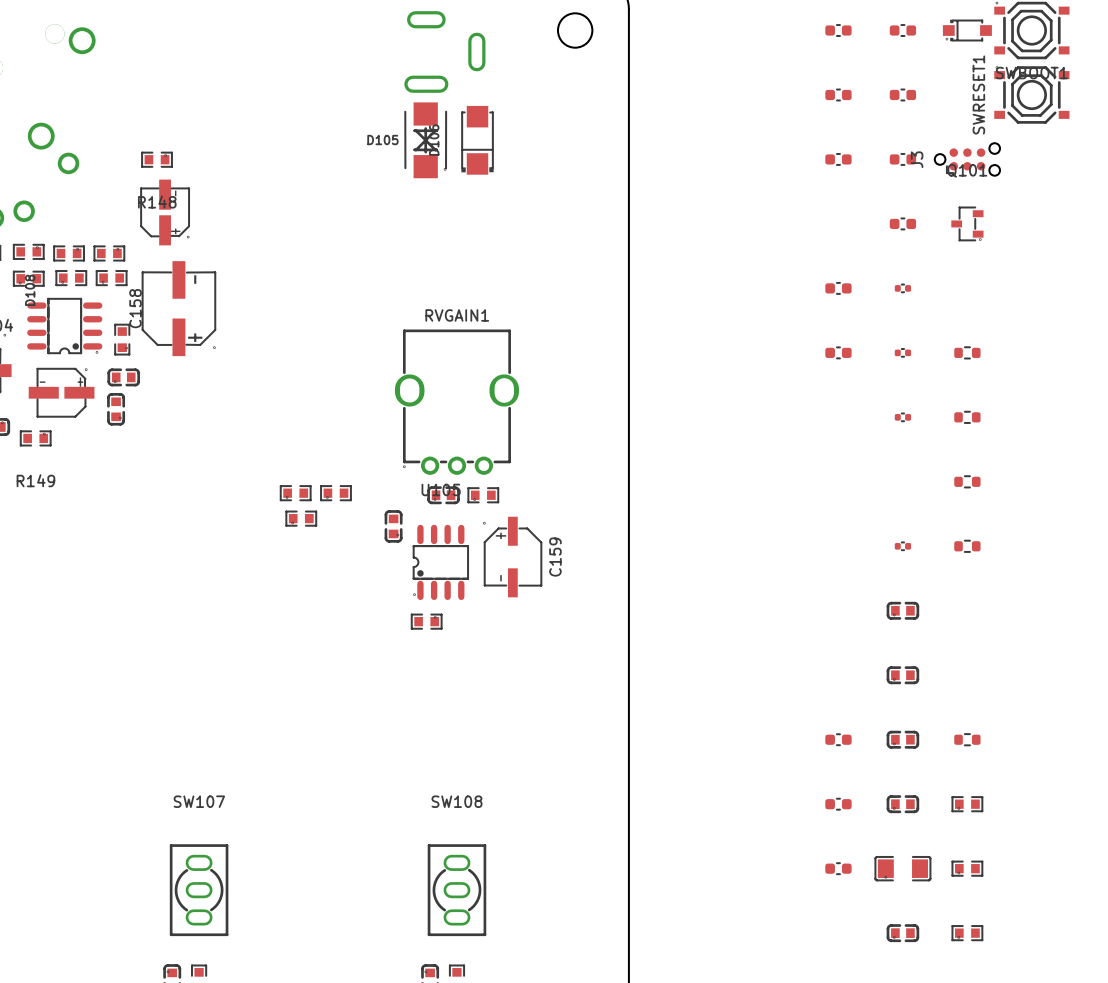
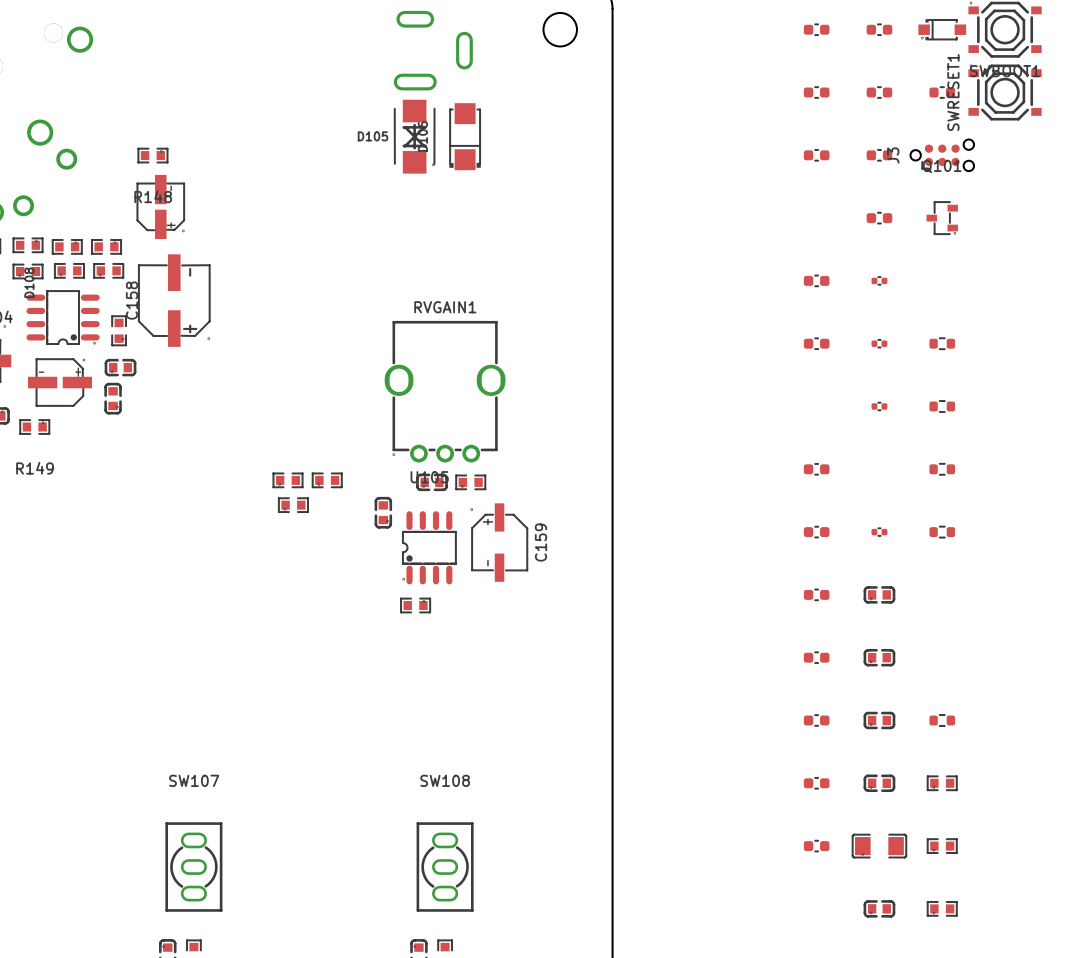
part: none -> (942, 92)
part: none -> (816, 469)
part: none -> (816, 532)
part: none -> (816, 594)
part: none -> (816, 657)

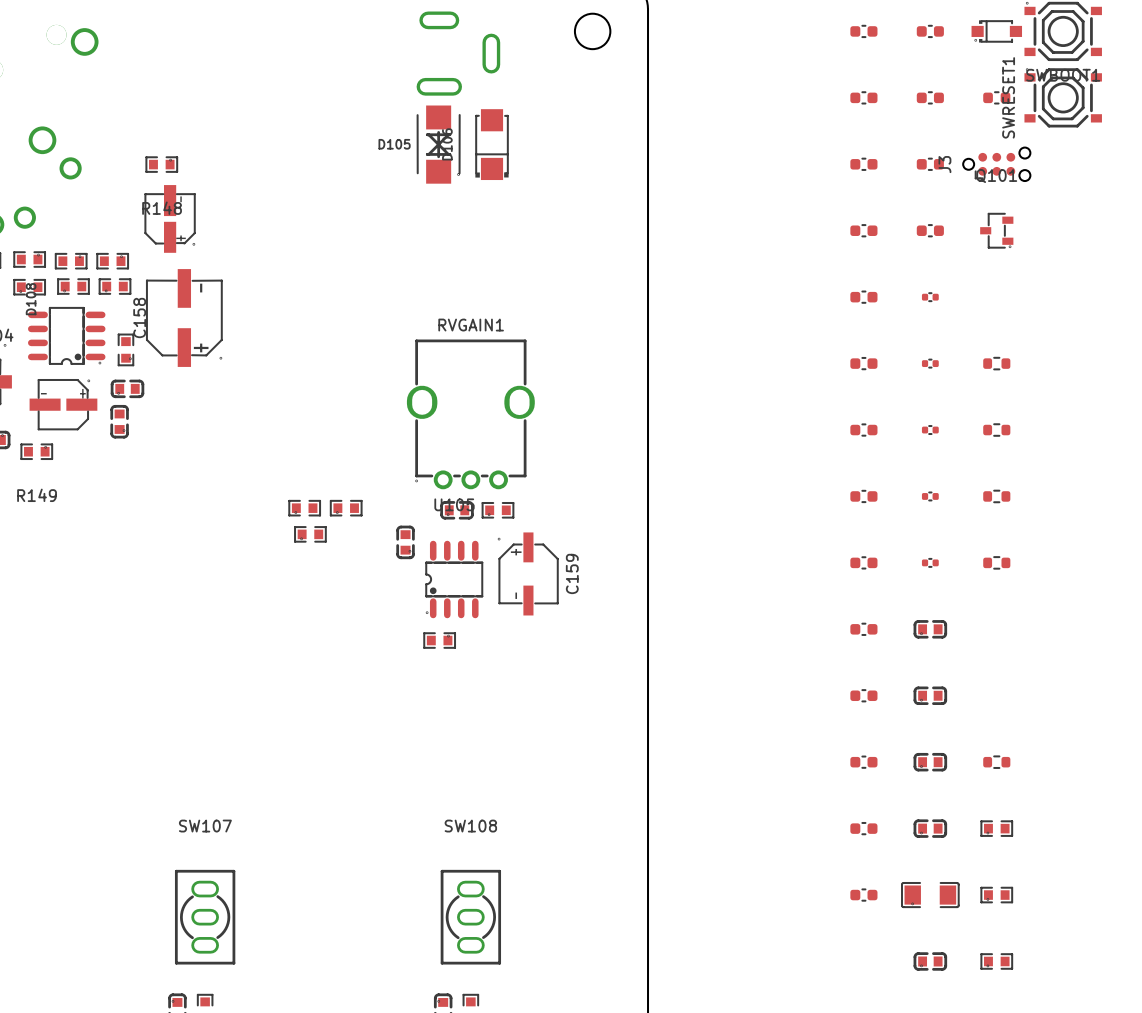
part: none -> (863, 230)
part: none -> (863, 430)
part: none -> (930, 496)

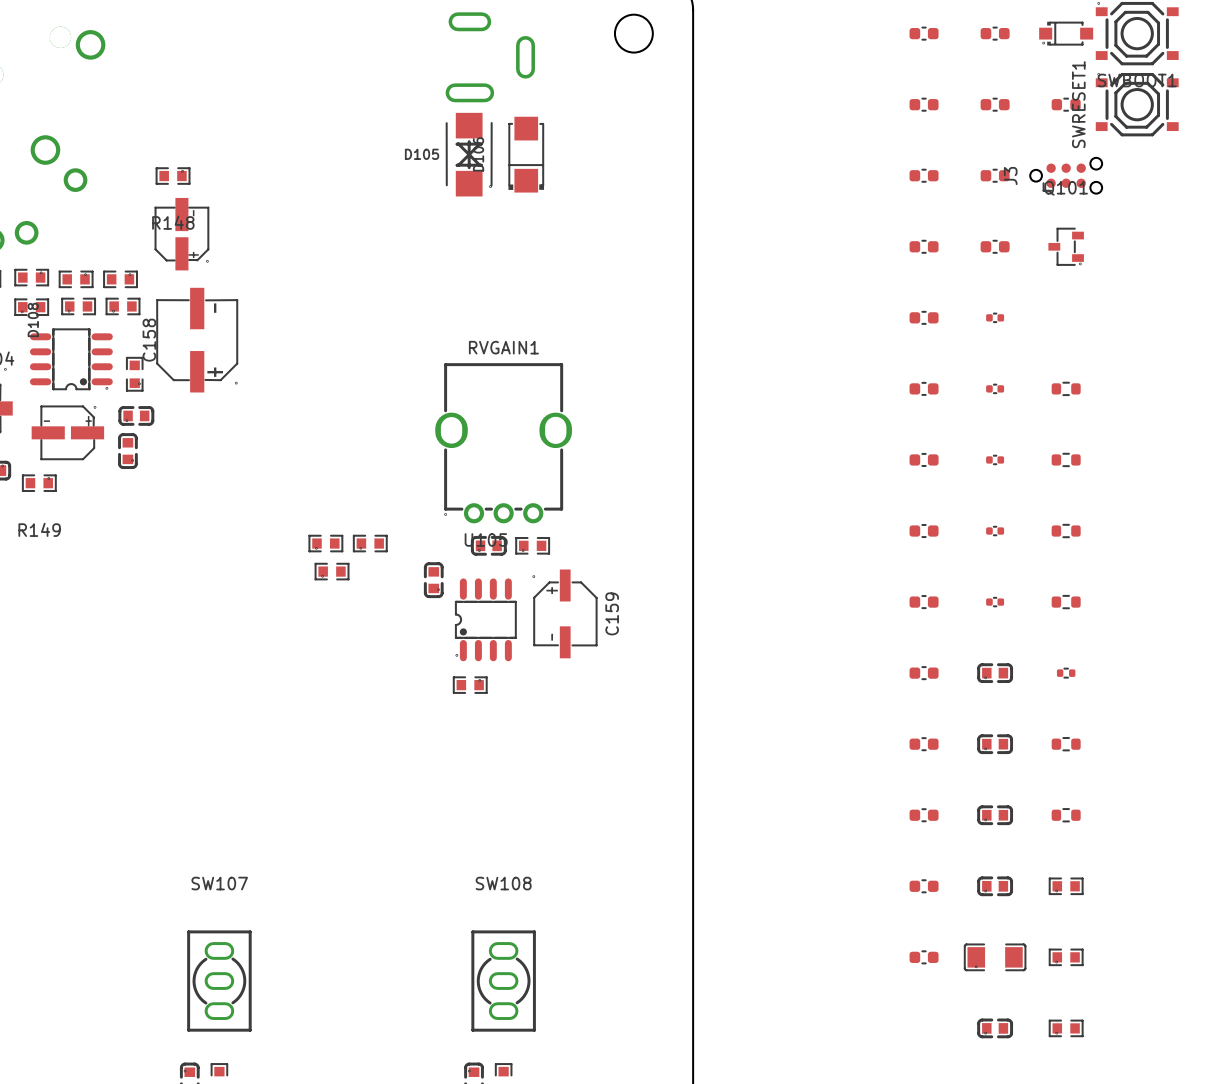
part: none -> (1066, 673)
part: none -> (1066, 744)

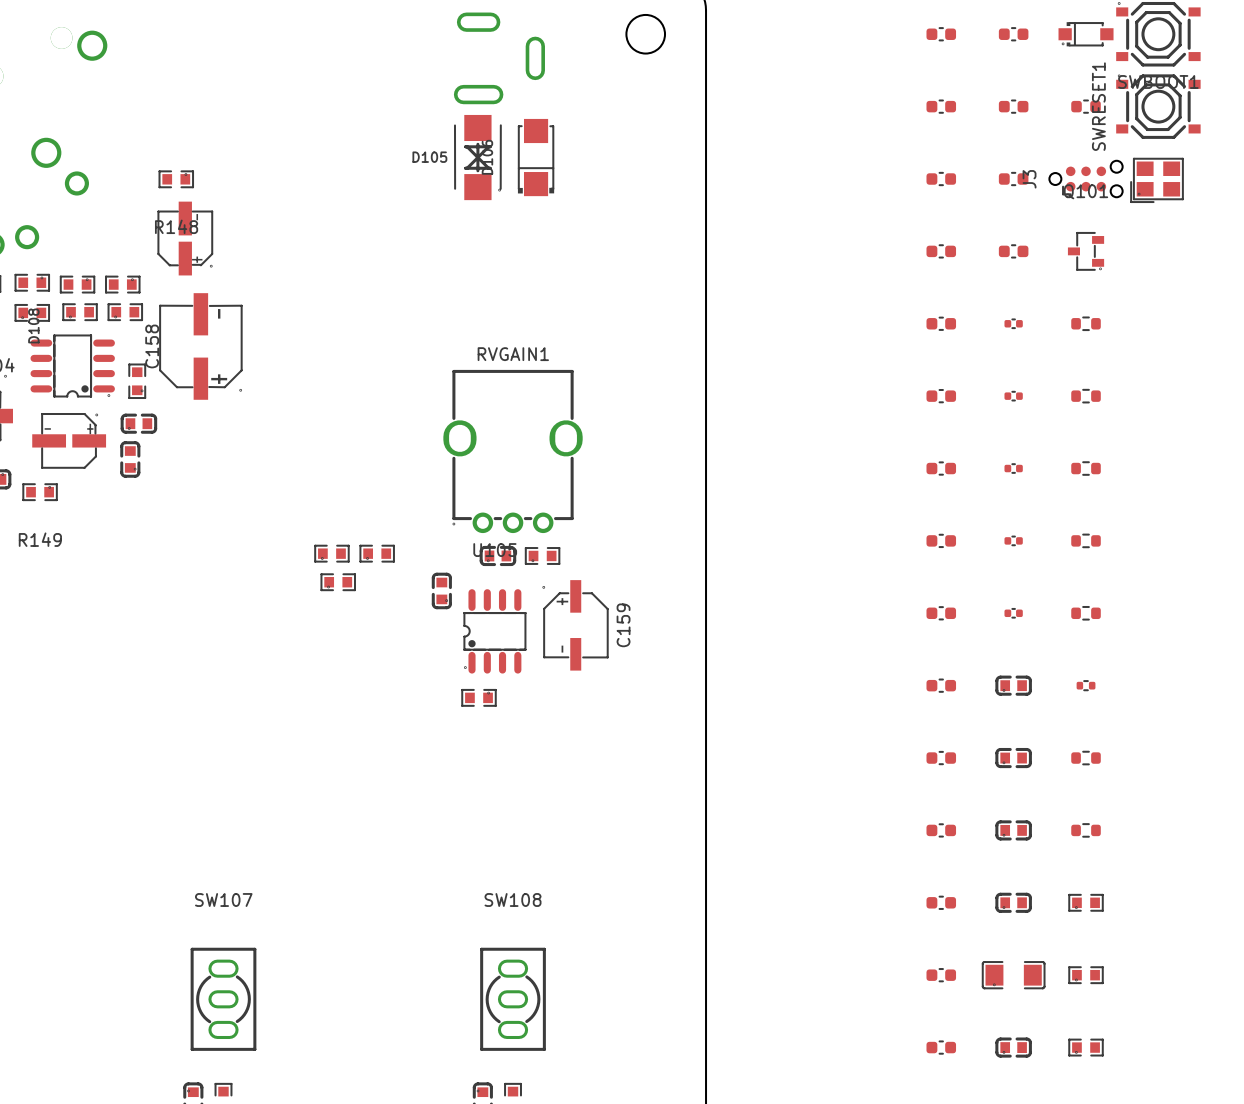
part: none -> (1157, 180)
part: none -> (1086, 323)
part: none -> (941, 1047)

